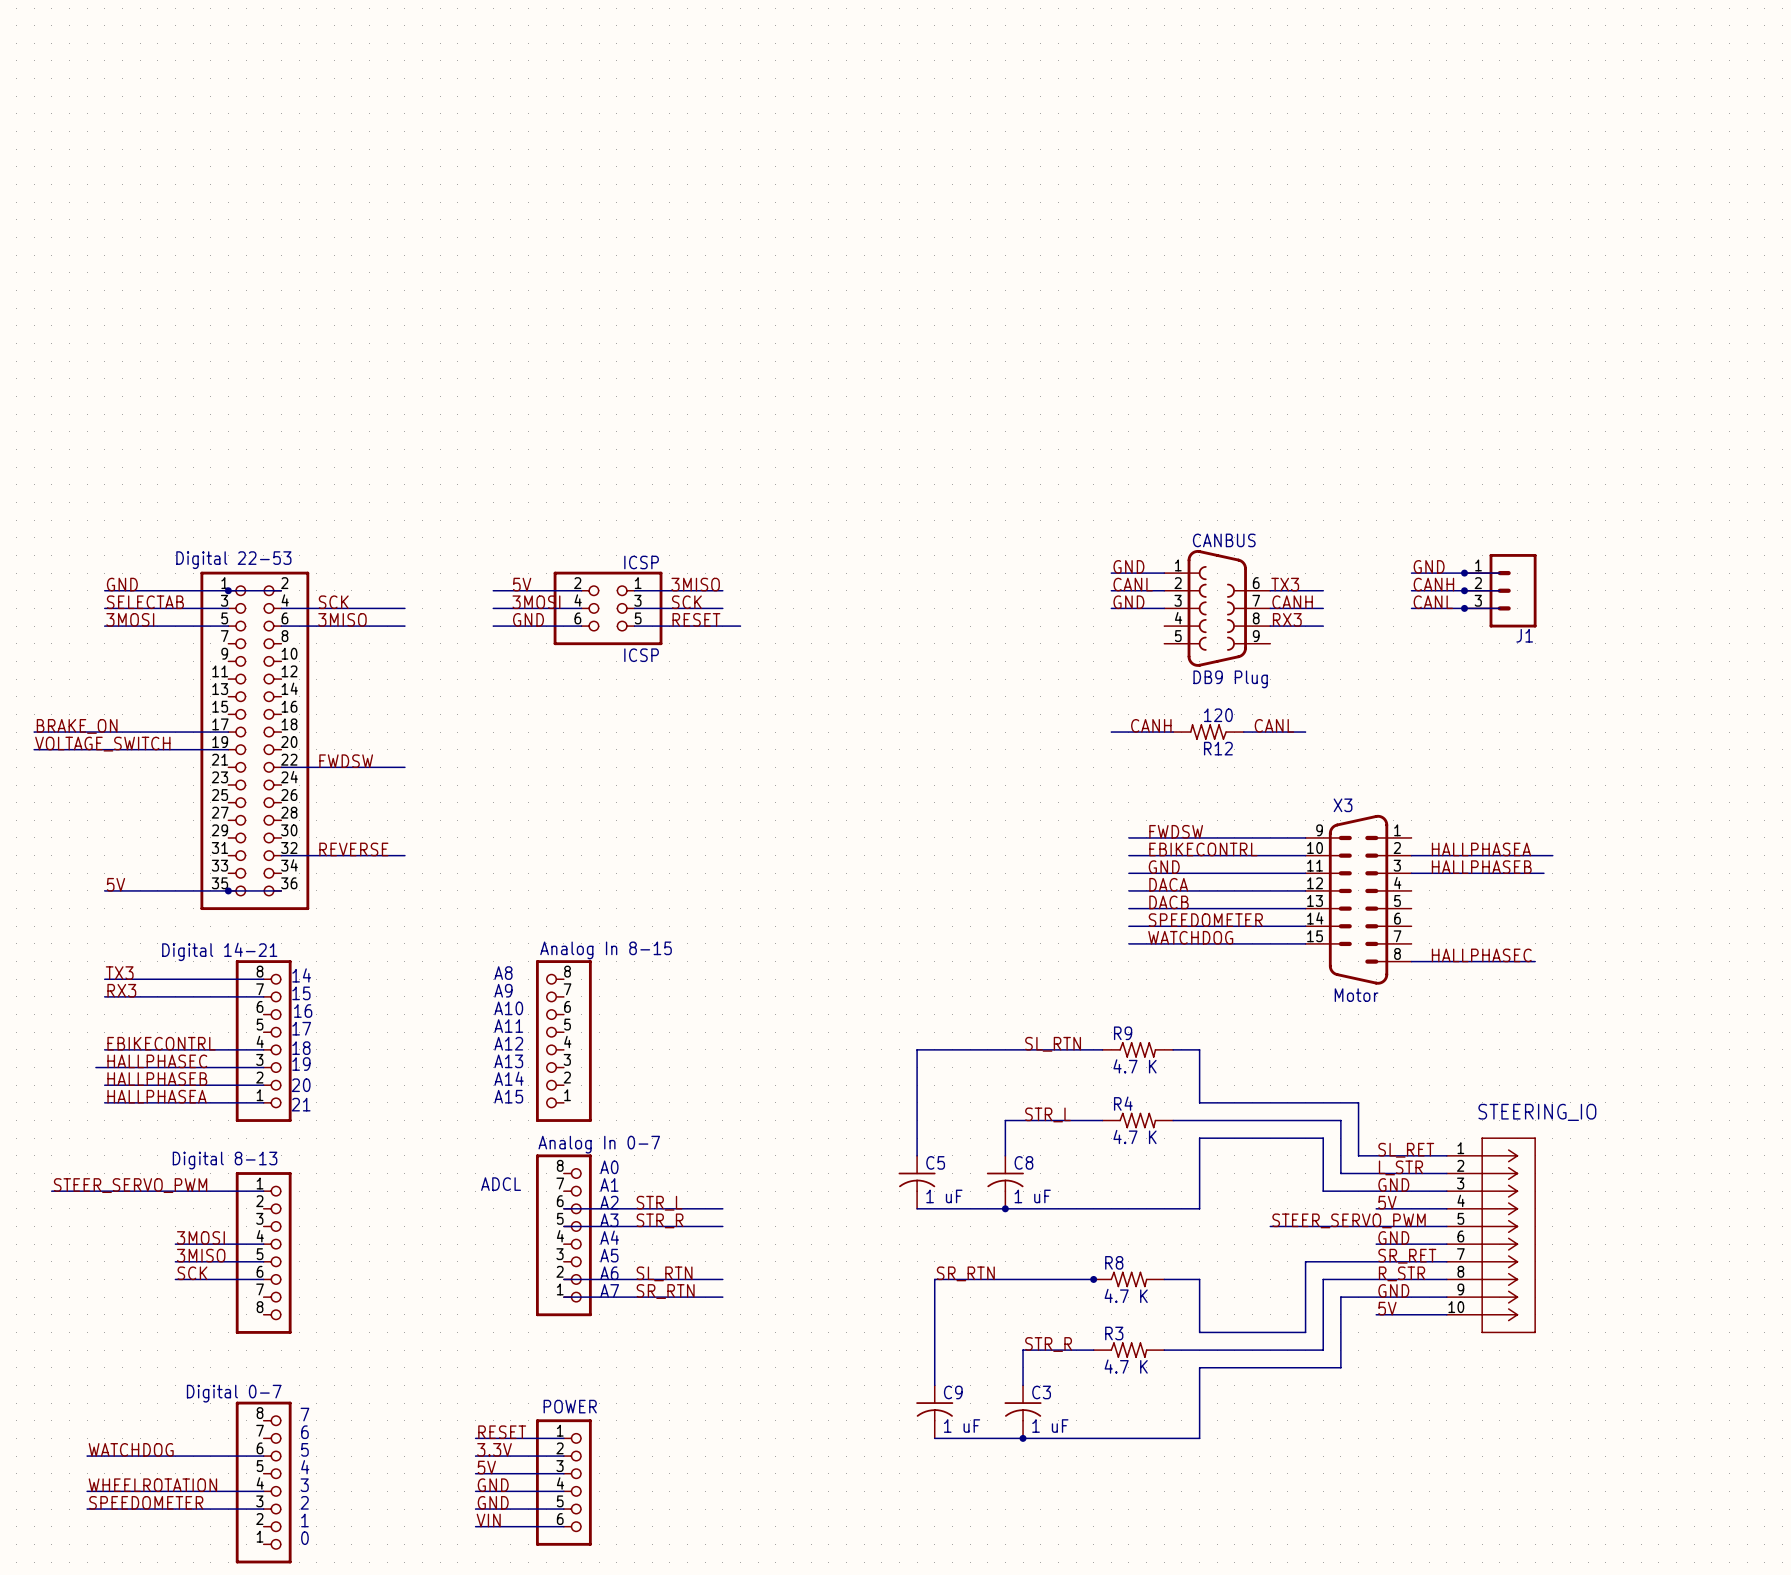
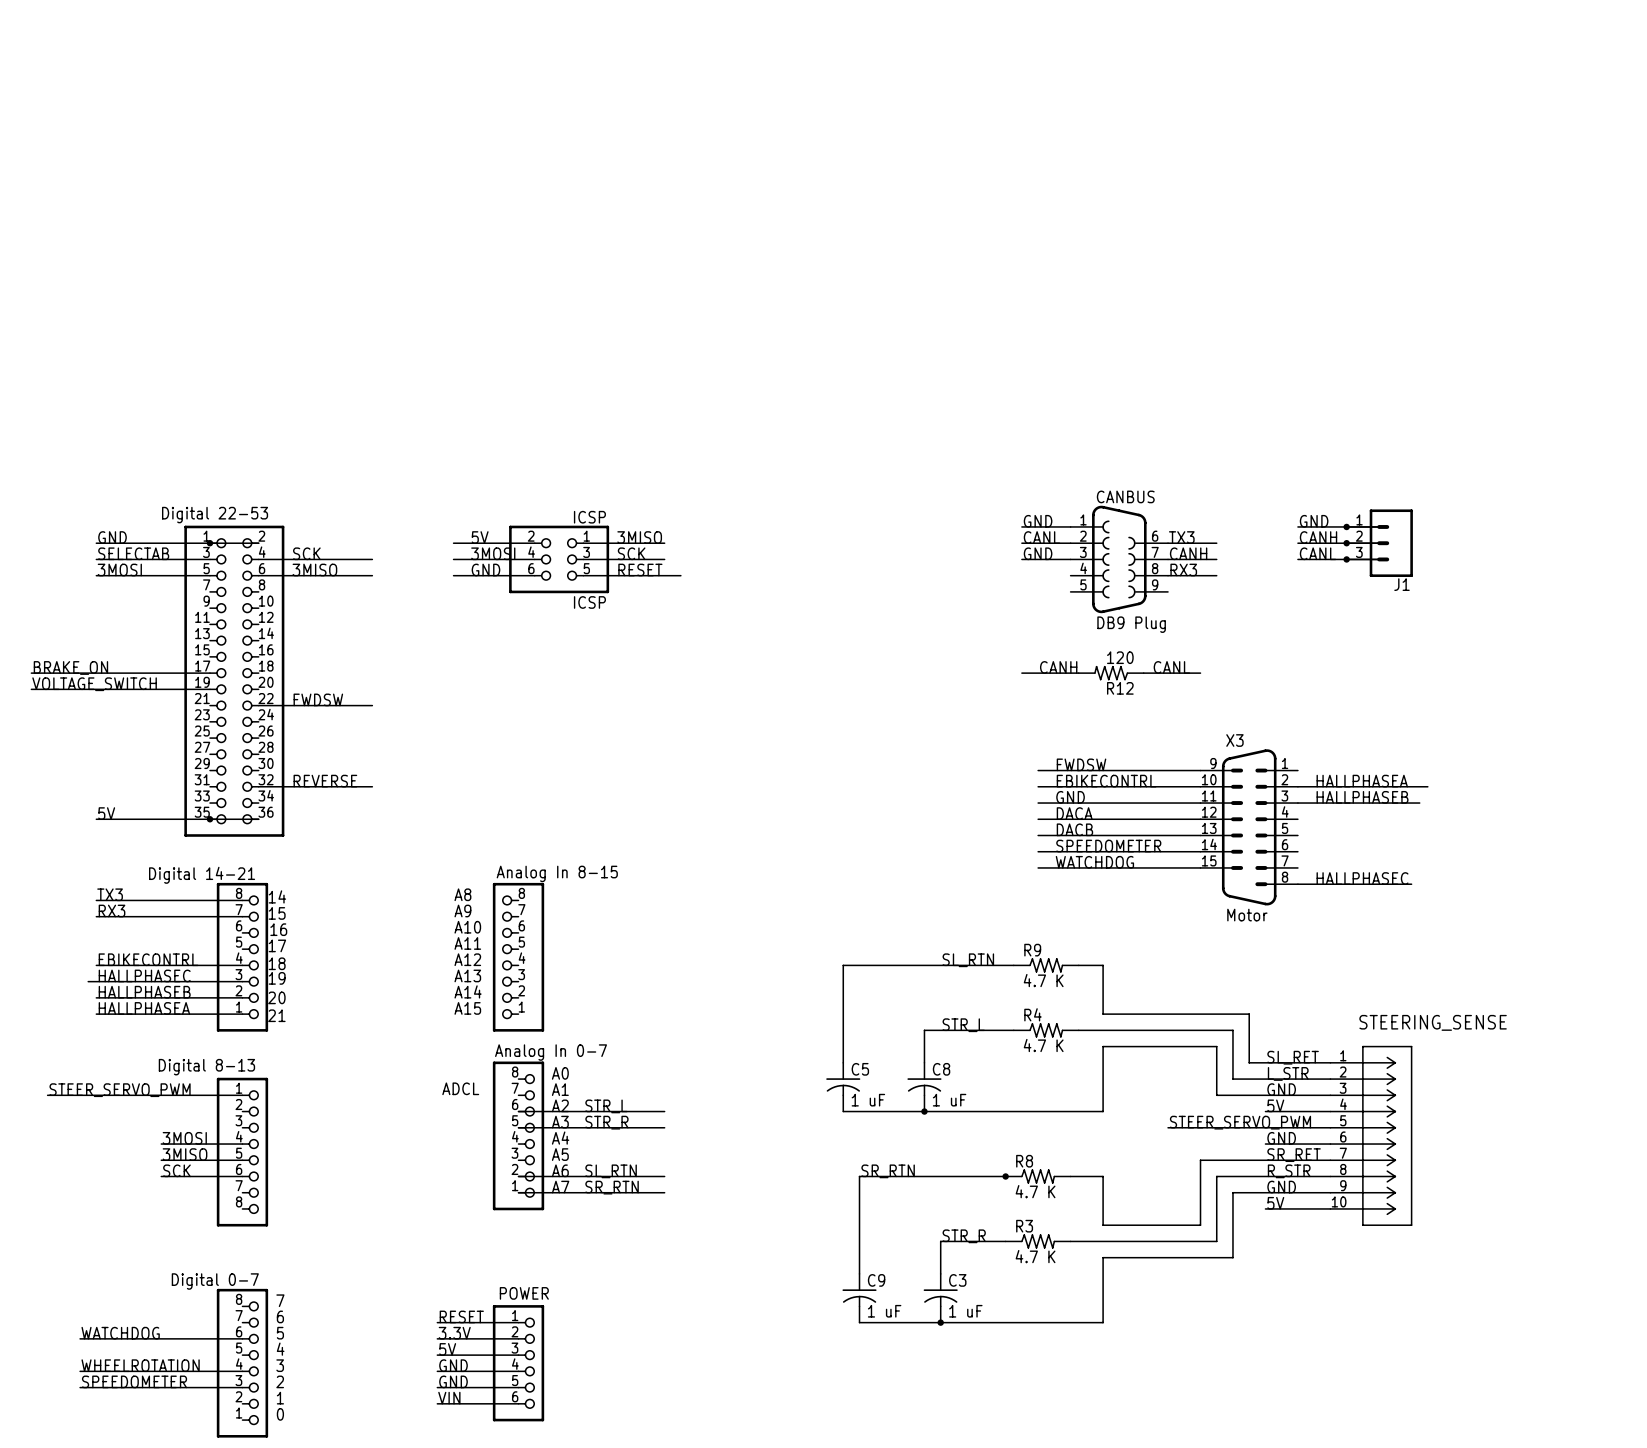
STEERING_IO name: STEERING_IO (1537, 1112) -> STEERING_SENSE (1433, 1022)

